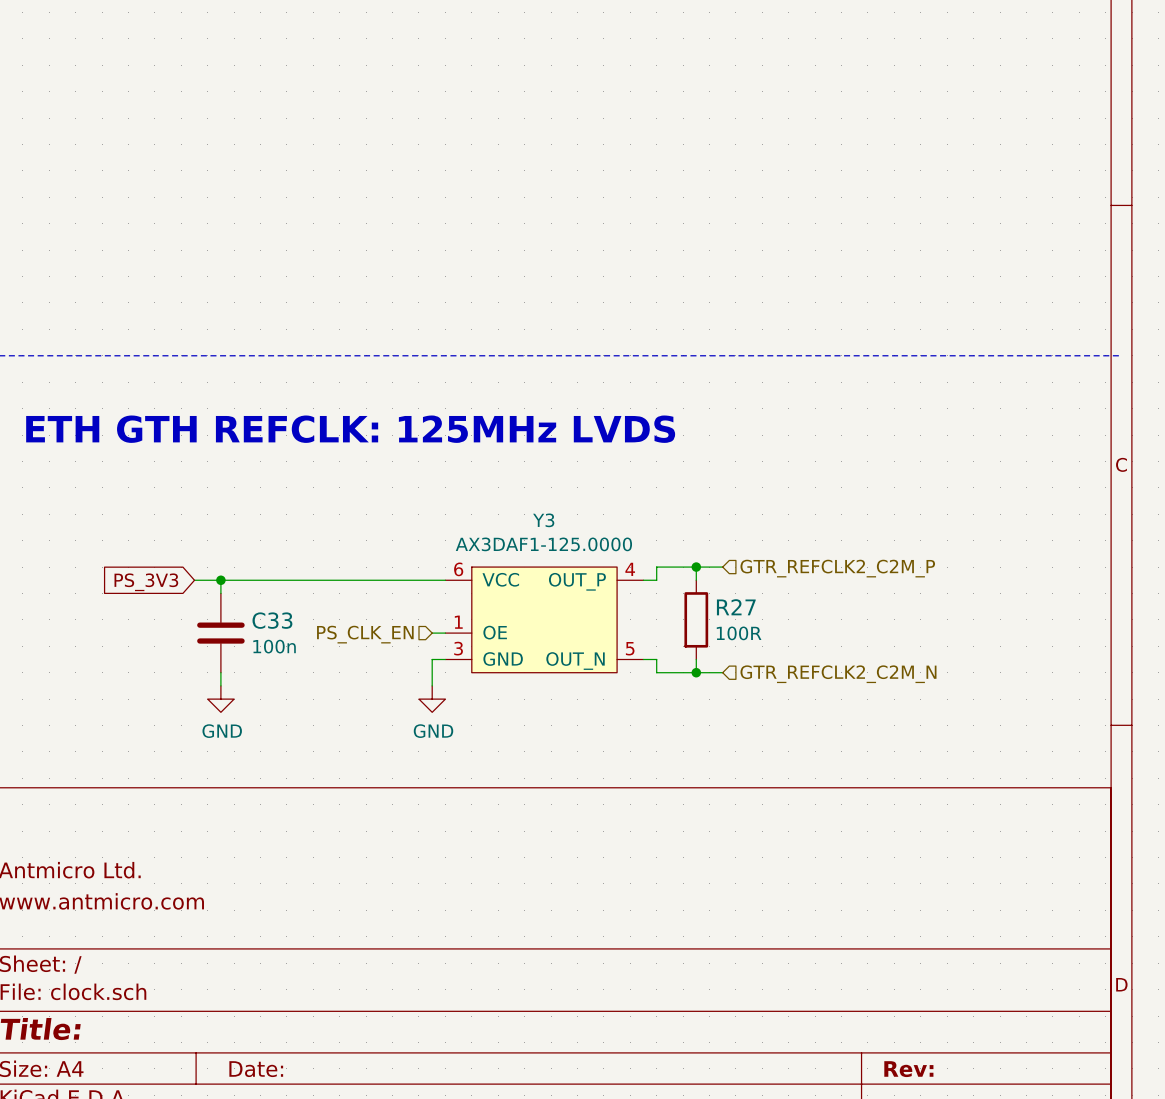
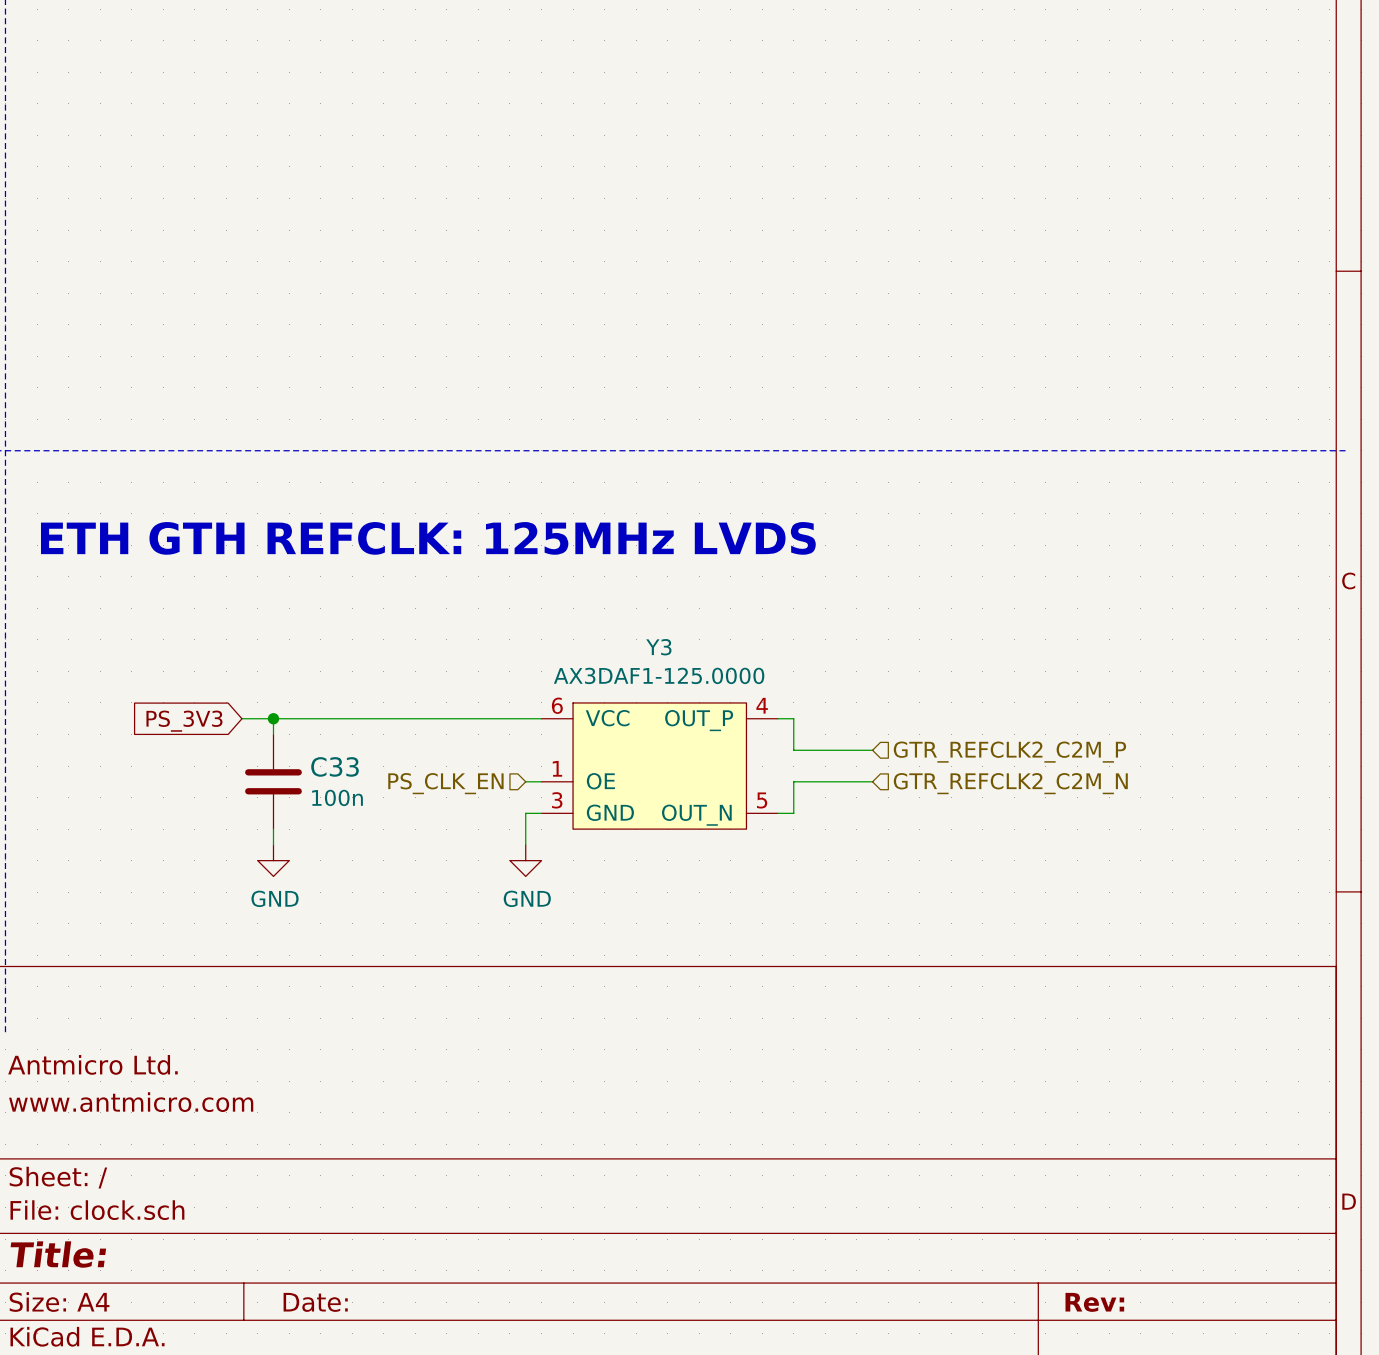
wire: (696, 567) (696, 580) -> none
junction: (696, 567) -> none
wire: (722, 567) (656, 567) (656, 580) -> (872, 750) (793, 750) (793, 718)
hierarchical label position: GTR_REFCLK2_C2M_P (837, 568) -> GTR_REFCLK2_C2M_P (1009, 752)
R27: (696, 619) -> none
wire: (656, 659) (656, 672) (722, 672) -> (793, 813) (793, 781) (872, 781)
wire: (696, 659) (696, 672) -> none
junction: (696, 672) -> none
hierarchical label position: GTR_REFCLK2_C2M_N (838, 674) -> GTR_REFCLK2_C2M_N (1010, 783)

